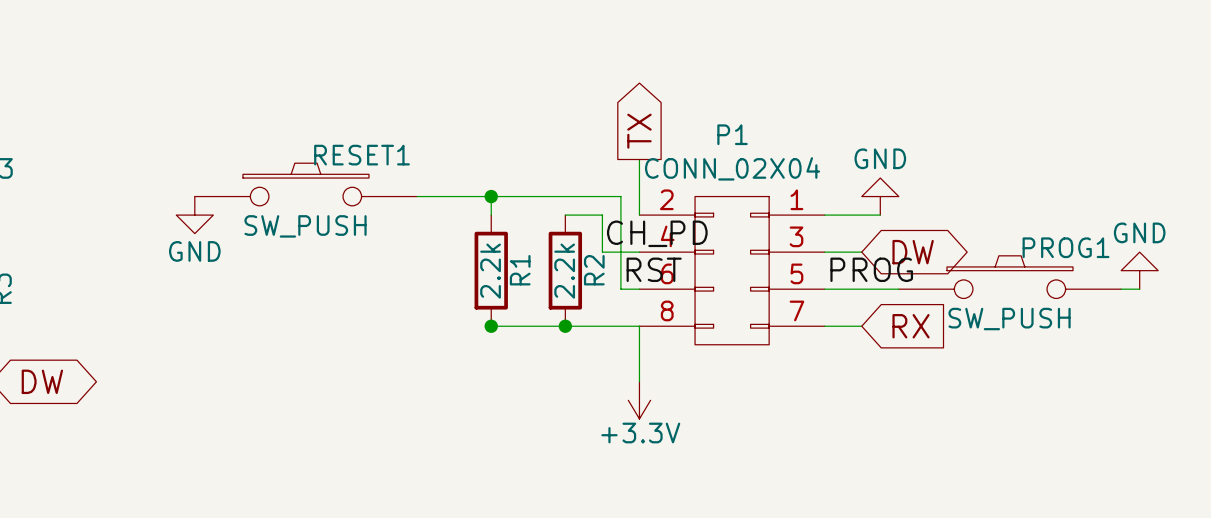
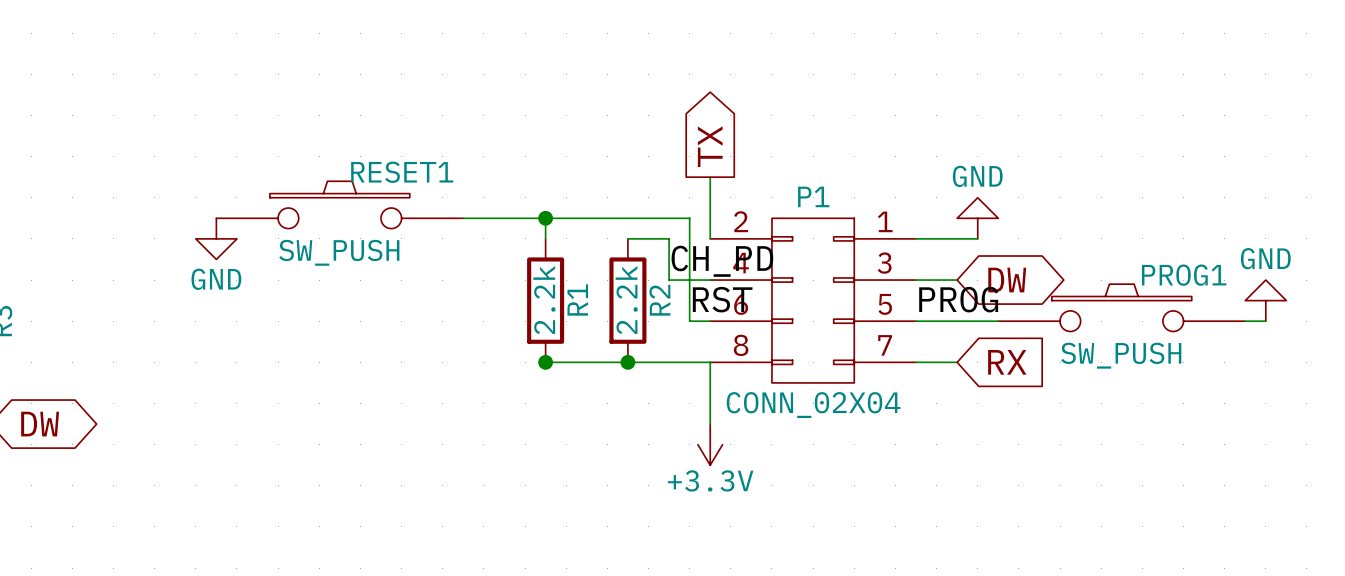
P1 name position: P1 (732, 134) -> P1 (813, 196)
P1 value position: CONN_02X04 (732, 168) -> CONN_02X04 (813, 405)

